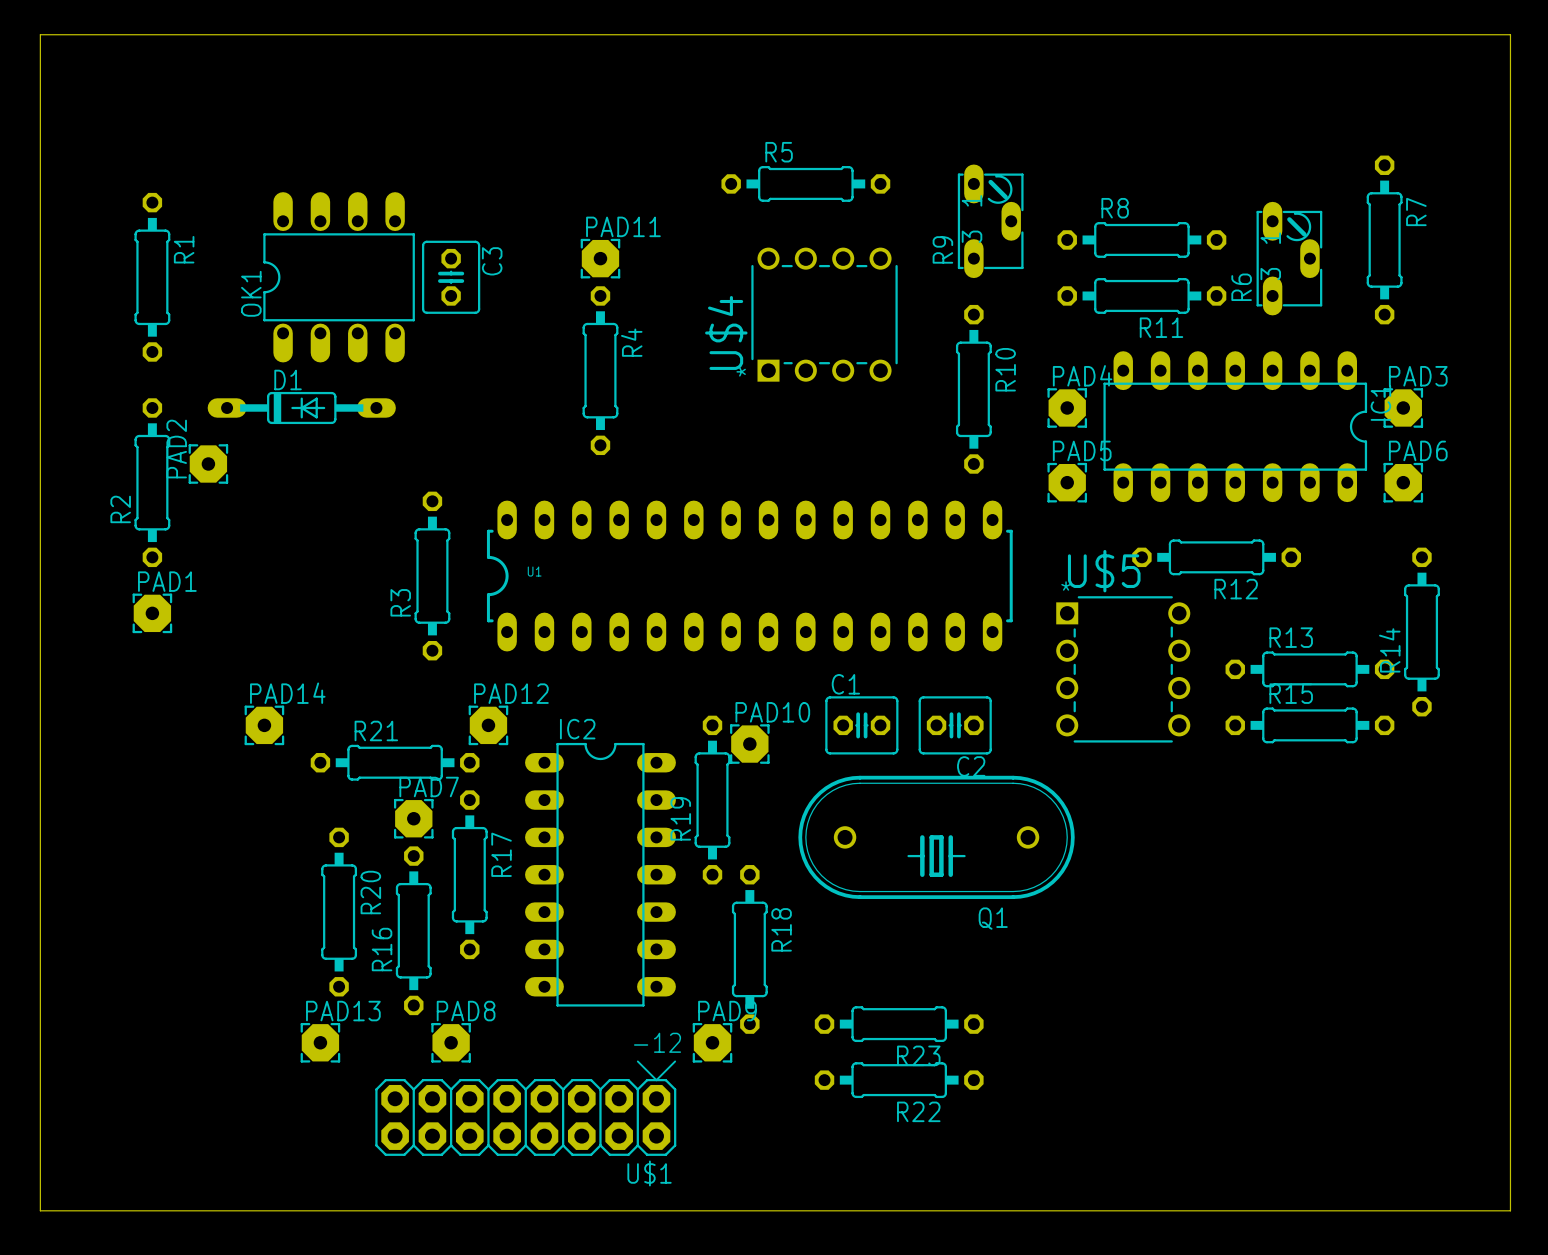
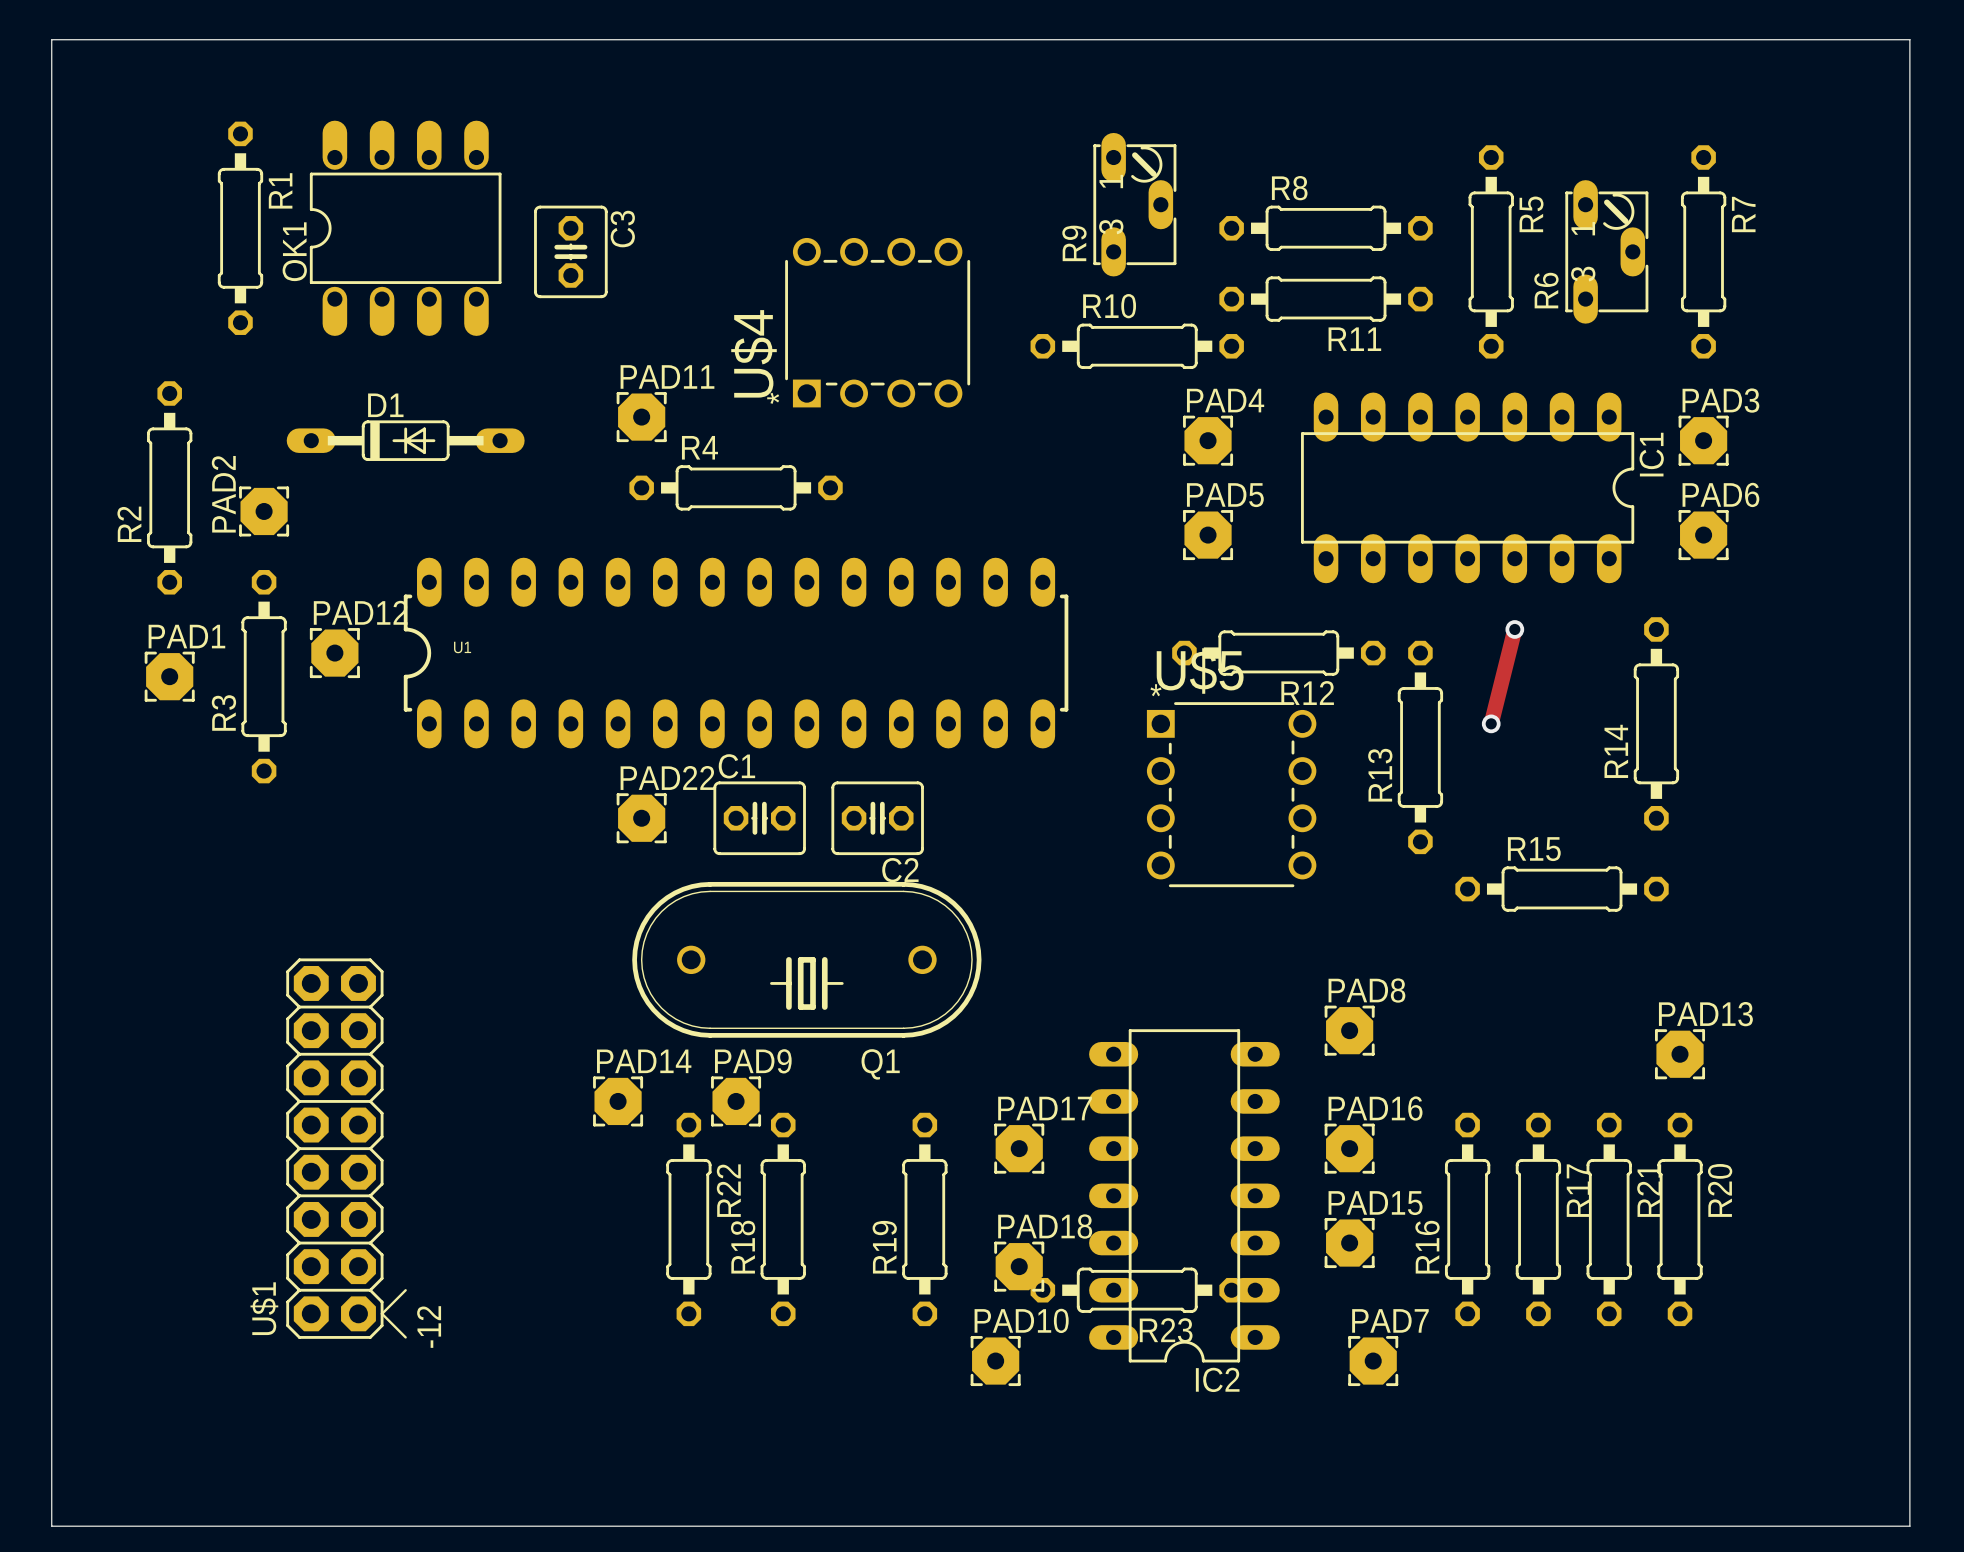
R5 rotation: 0° (805, 183) -> 90° clockwise (1491, 251)
R5 position: (805, 183) -> (1491, 251)
R9 position: (990, 221) -> (1134, 204)
R8 position: (1141, 239) -> (1326, 228)
R7 position: (1384, 239) -> (1703, 251)
PAD11 position: (600, 258) -> (641, 417)
R6 position: (1289, 258) -> (1606, 251)
R1 position: (152, 277) -> (240, 228)
OK1 position: (339, 277) -> (405, 228)
C3 position: (451, 277) -> (570, 251)
R11 position: (1141, 295) -> (1326, 299)
U$4 position: (824, 314) -> (877, 322)
R4 name position: R4 (631, 342) -> R4 (699, 447)
R10 name position: R10 (1005, 369) -> R10 (1109, 306)
R4 rotation: 0° (600, 370) -> 90° clockwise (736, 487)
R10 rotation: 0° (973, 389) -> 90° clockwise (1137, 346)
R10 position: (973, 389) -> (1137, 346)
D1 position: (301, 407) -> (405, 440)
PAD4 position: (1067, 407) -> (1208, 440)
PAD3 position: (1403, 407) -> (1703, 440)
IC1 position: (1235, 426) -> (1467, 487)
PAD2 position: (208, 464) -> (264, 511)
R2 position: (152, 482) -> (169, 487)
PAD5 position: (1067, 482) -> (1208, 535)
PAD6 position: (1403, 482) -> (1703, 535)
track: none -> (1514, 629) (1491, 723)
via: none -> (1514, 629)
R12 position: (1216, 557) -> (1278, 653)
R3 position: (432, 576) -> (264, 676)
U1 position: (749, 576) -> (736, 653)
via: none -> (1491, 723)
PAD1 position: (152, 613) -> (169, 676)
R14 position: (1421, 632) -> (1656, 723)
R13 name position: R13 (1291, 637) -> R13 (1380, 775)
PAD22: none -> (641, 818)
U$5 position: (1123, 669) -> (1231, 794)
R13 rotation: 0° (1309, 669) -> 90° clockwise (1420, 747)
R13 position: (1309, 669) -> (1420, 747)
PAD14 position: (264, 725) -> (618, 1101)
PAD12 position: (488, 725) -> (334, 653)
C1 position: (861, 725) -> (759, 818)
C2 position: (955, 725) -> (877, 818)
R15 position: (1309, 725) -> (1562, 889)
PAD10 position: (749, 744) -> (995, 1361)
R21 rotation: 0° (395, 762) -> 90° clockwise (1609, 1219)
R21 position: (395, 762) -> (1609, 1219)
R19 position: (712, 800) -> (924, 1219)
PAD7 position: (413, 818) -> (1373, 1361)
Q1 position: (936, 837) -> (806, 959)
R17 position: (469, 874) -> (1538, 1219)
IC2 rotation: 0° (600, 874) -> 180° (1184, 1195)
IC2 position: (600, 874) -> (1184, 1195)
R20 position: (339, 912) -> (1680, 1219)
PAD17: none -> (1019, 1148)
PAD16: none -> (1349, 1148)
R18 name position: R18 (781, 929) -> R18 (743, 1247)
R16 position: (413, 930) -> (1467, 1219)
R18 position: (749, 949) -> (783, 1219)
PAD15: none -> (1349, 1243)
PAD18: none -> (1019, 1266)
PAD13 position: (320, 1042) -> (1680, 1054)
PAD8 position: (451, 1042) -> (1349, 1030)
PAD9 position: (712, 1042) -> (736, 1101)
U$1 footprint: [375, 1060, 677, 1156] -> [286, 958, 407, 1339]
R22 rotation: 0° (899, 1080) -> 90° clockwise (688, 1219)
R22 position: (899, 1080) -> (688, 1219)
R22 name position: R22 (918, 1111) -> R22 (728, 1190)
U$1 name position: U$1 (649, 1173) -> U$1 (264, 1308)

